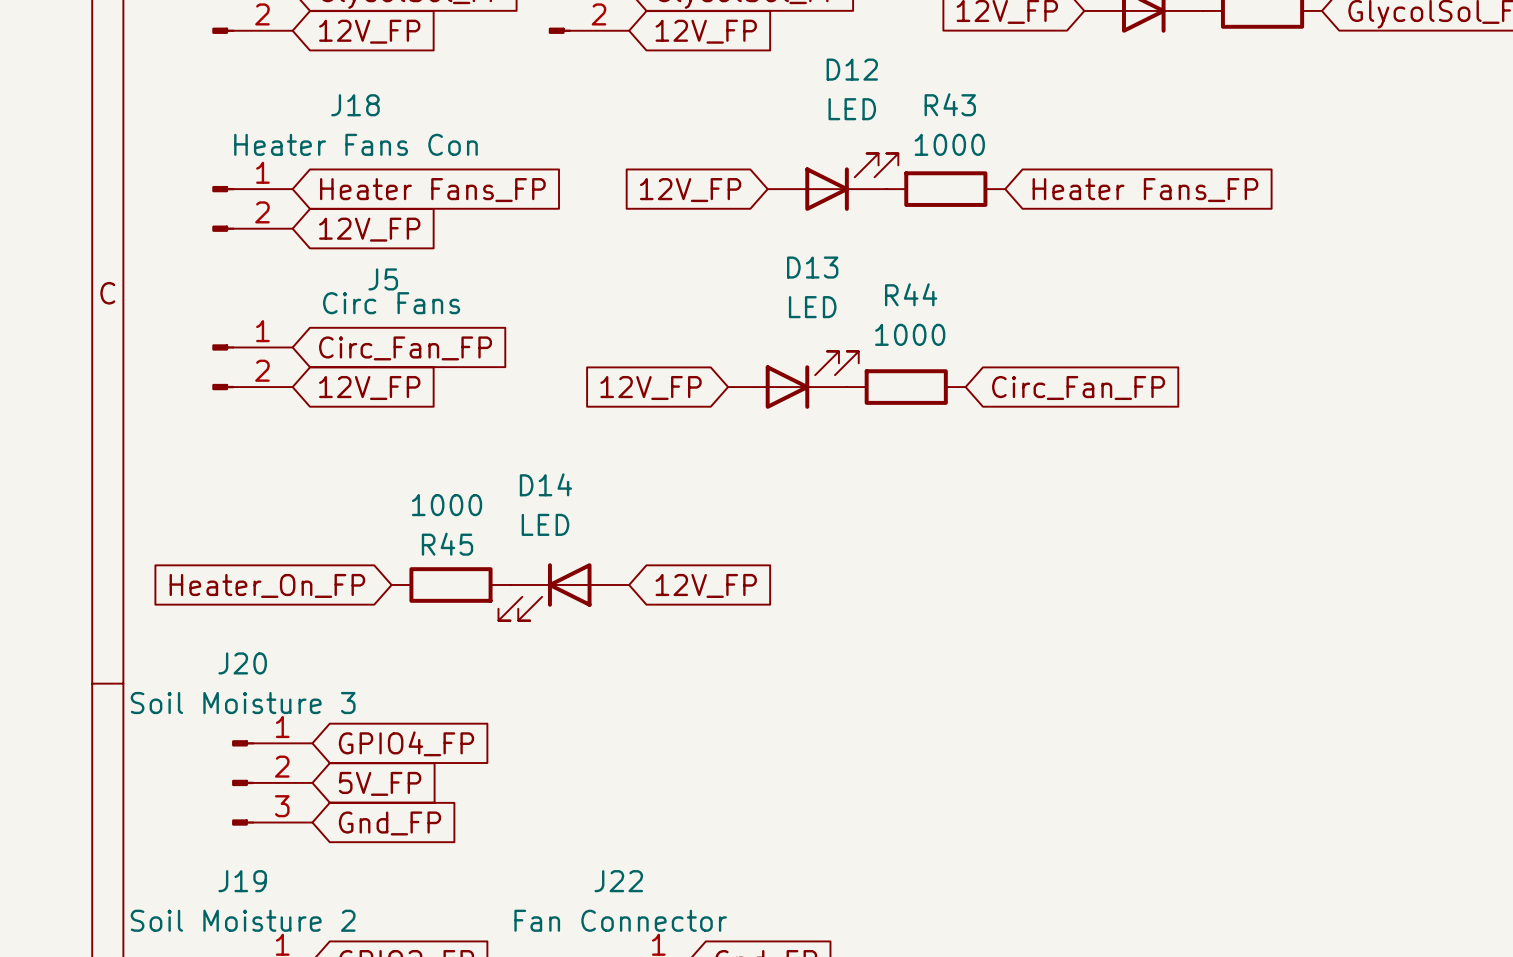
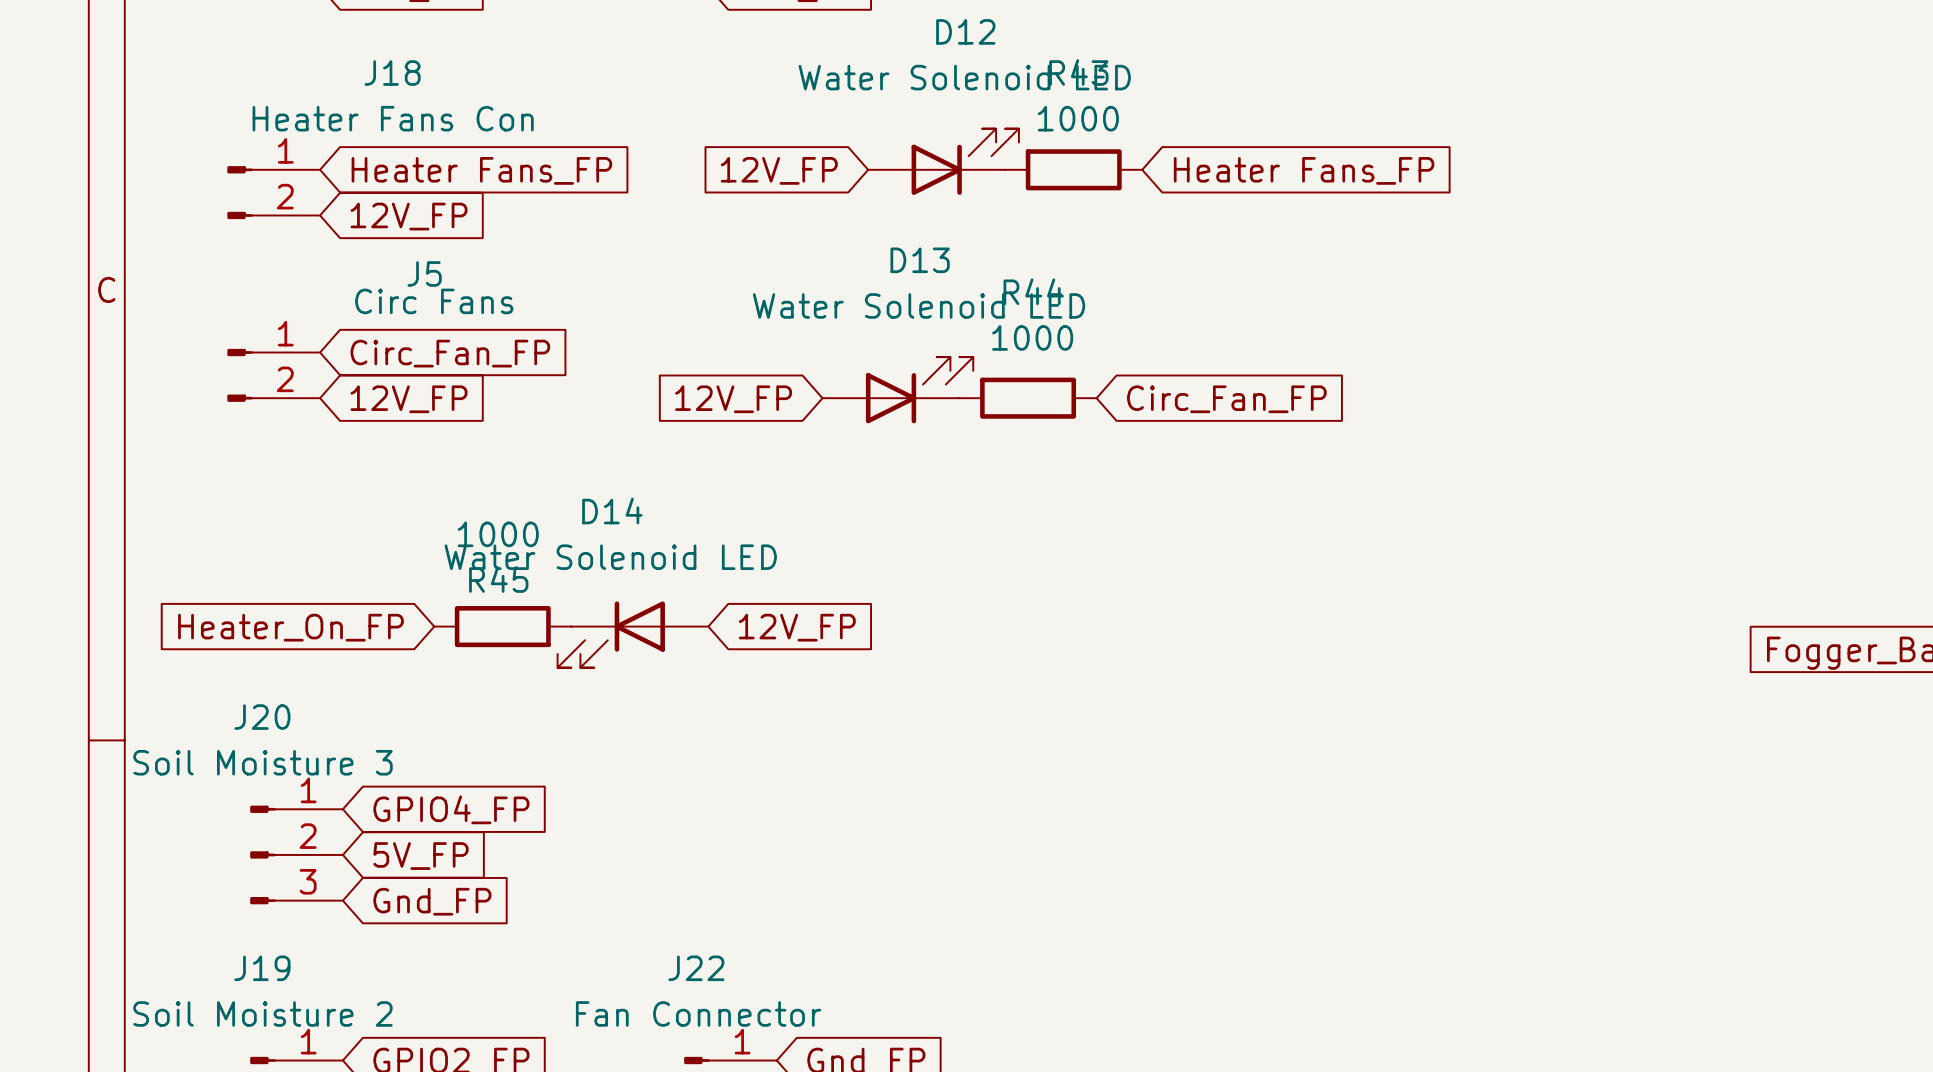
D12 value: LED (852, 109) -> Water Solenoid LED (964, 77)
D13 value: LED (812, 307) -> Water Solenoid LED (919, 305)
D14 value: LED (545, 524) -> Water Solenoid LED (610, 557)

